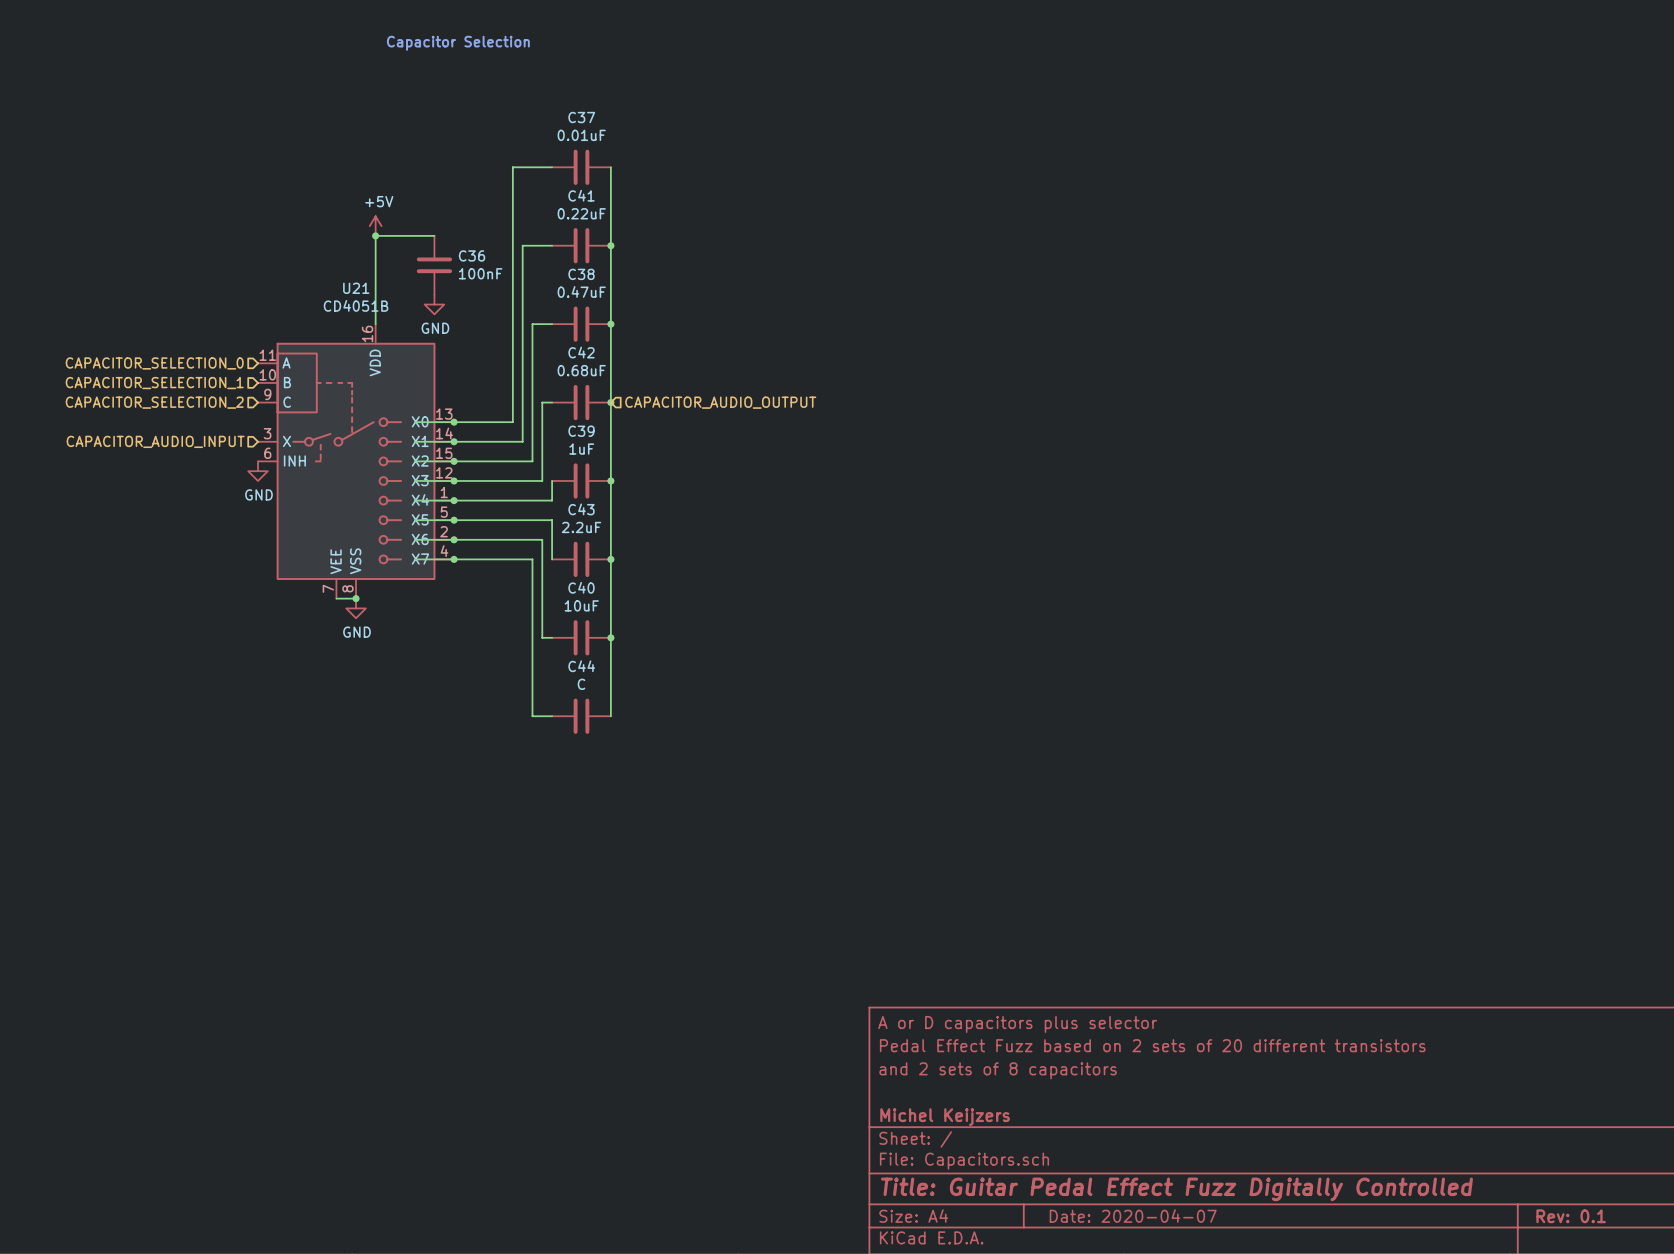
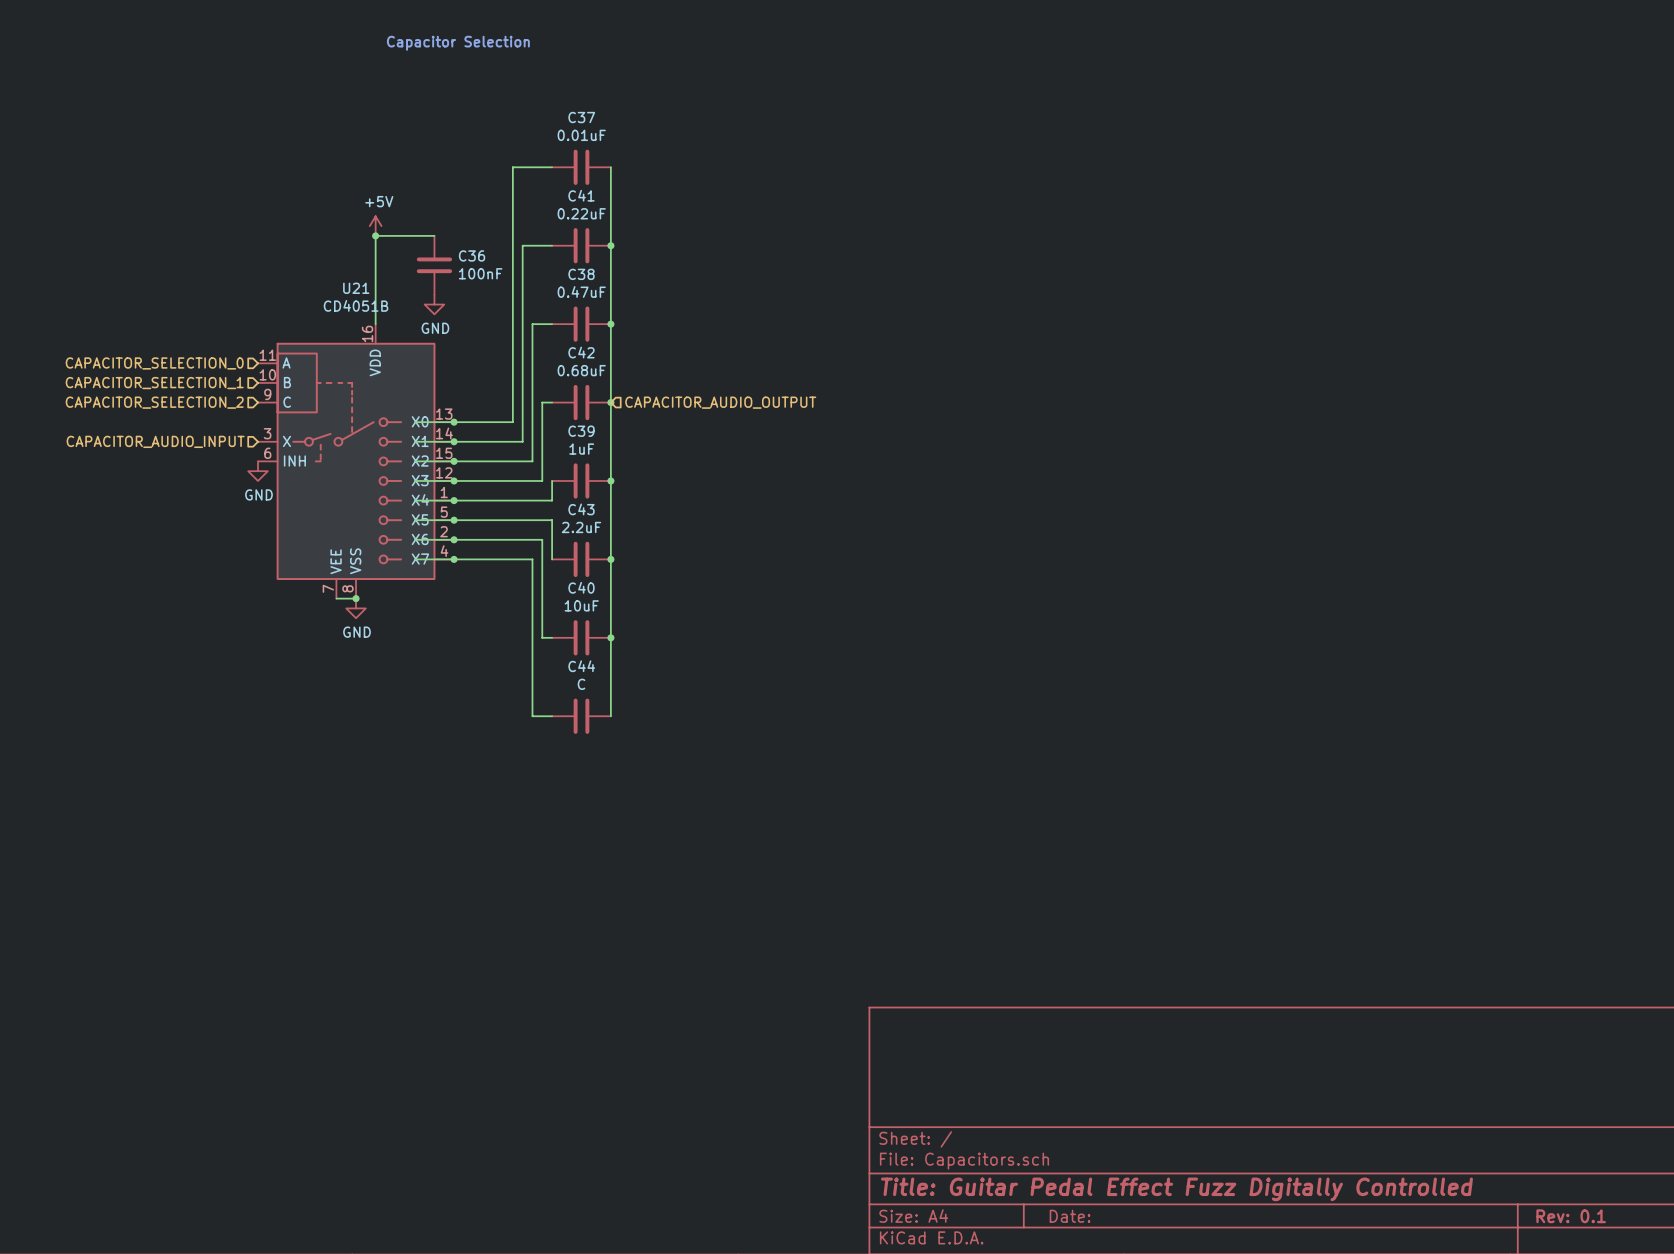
title block: A or D capacitors plus selector (1017, 1024) -> none
title block: Pedal Effect Fuzz based on 2 sets of 20 different transistors (1152, 1045) -> none
title block: and 2 sets of 8 capacitors (998, 1070) -> none
title block: Michel Keijzers (945, 1117) -> none
title block: Date: 2020-04-07 (1133, 1216) -> Date: (1070, 1216)

